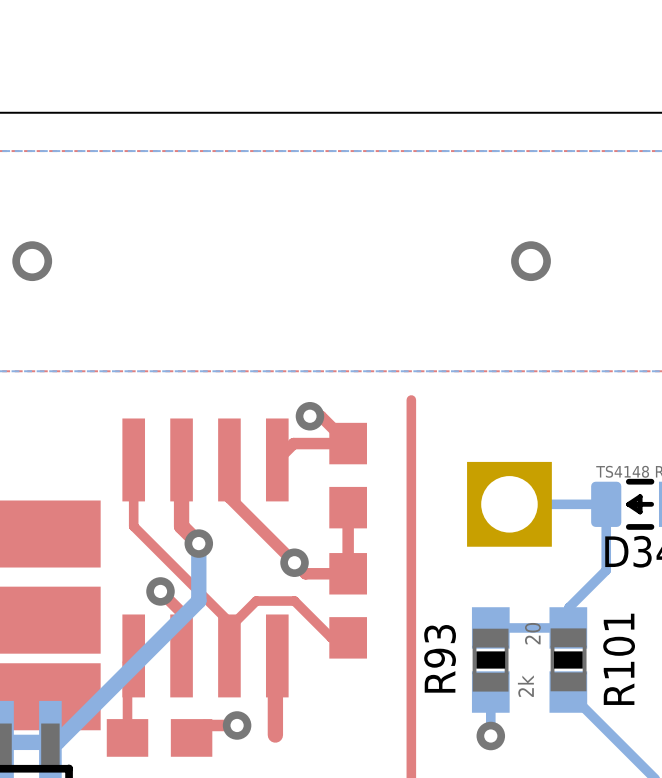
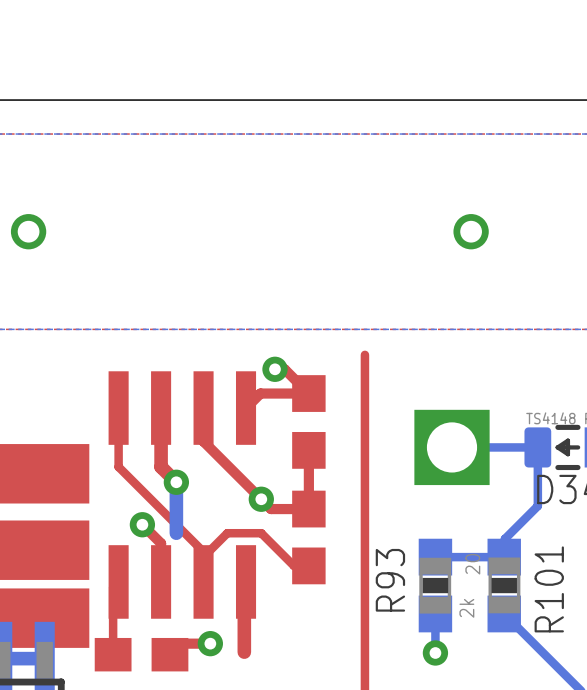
bottom track: (198, 601) (57, 742) (50, 742) -> none

